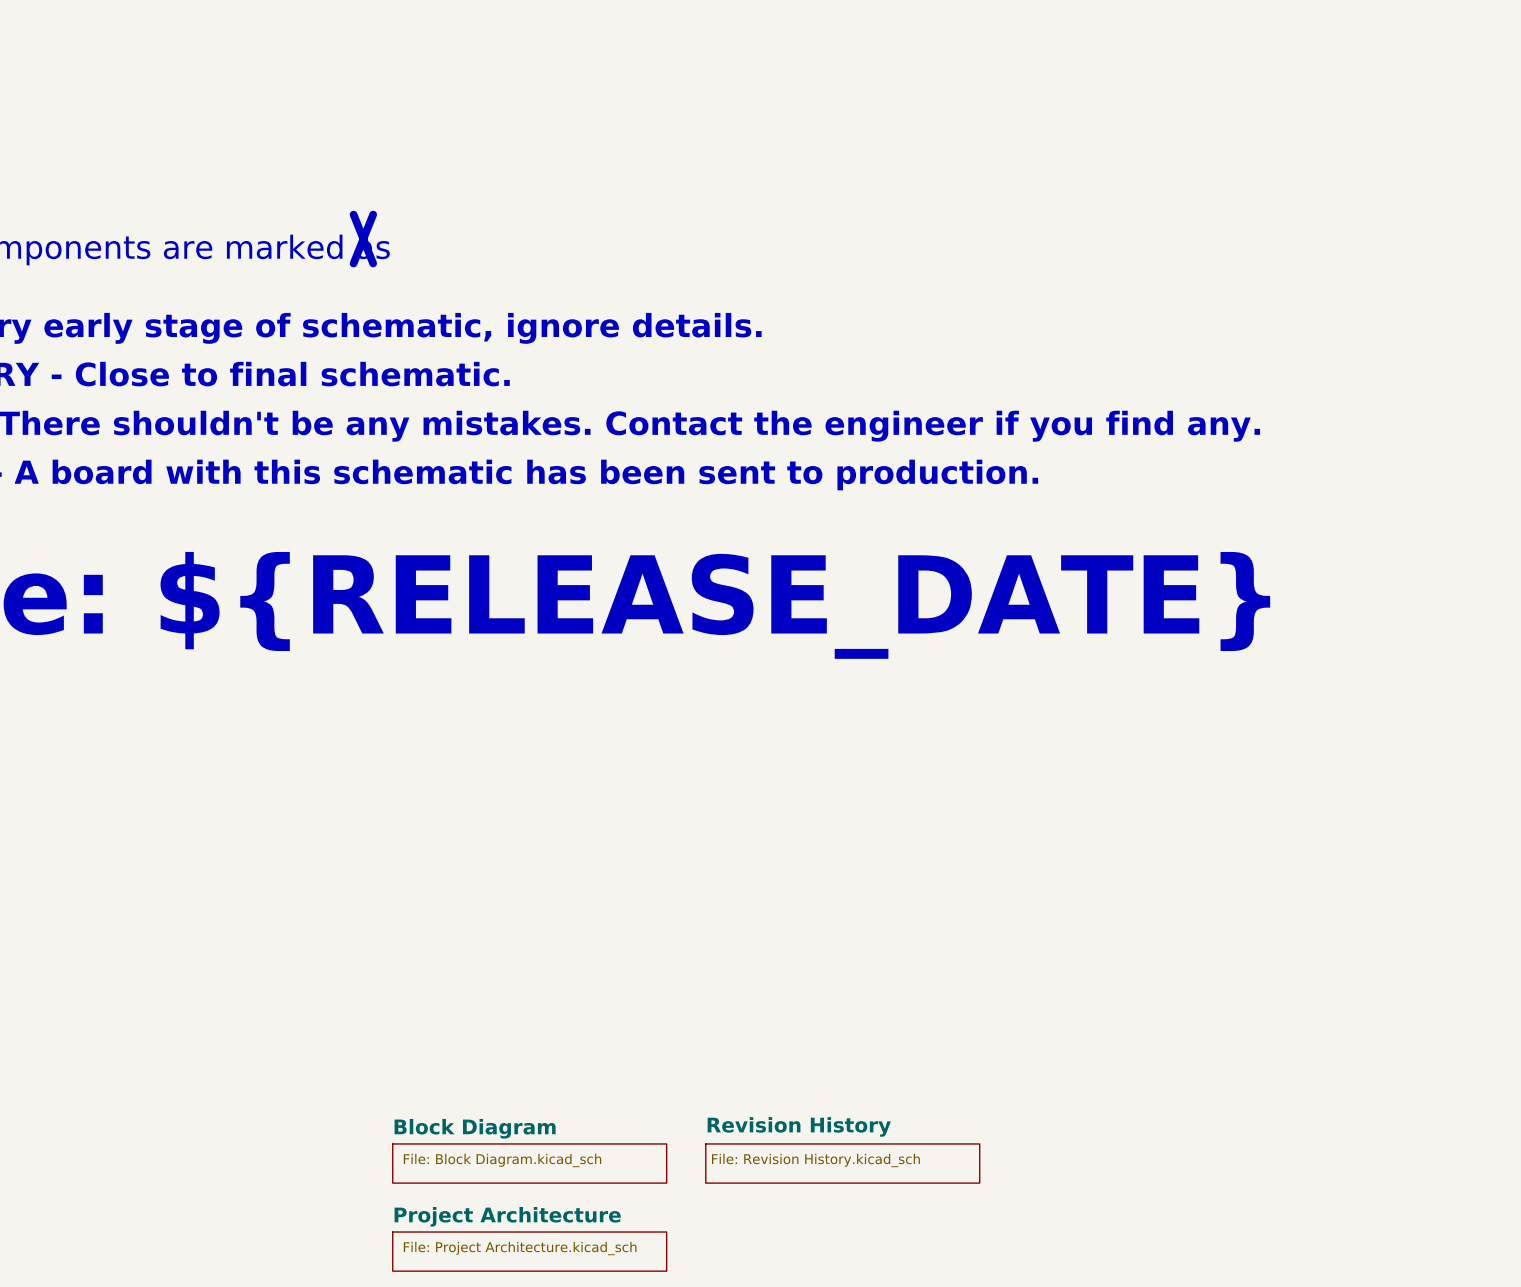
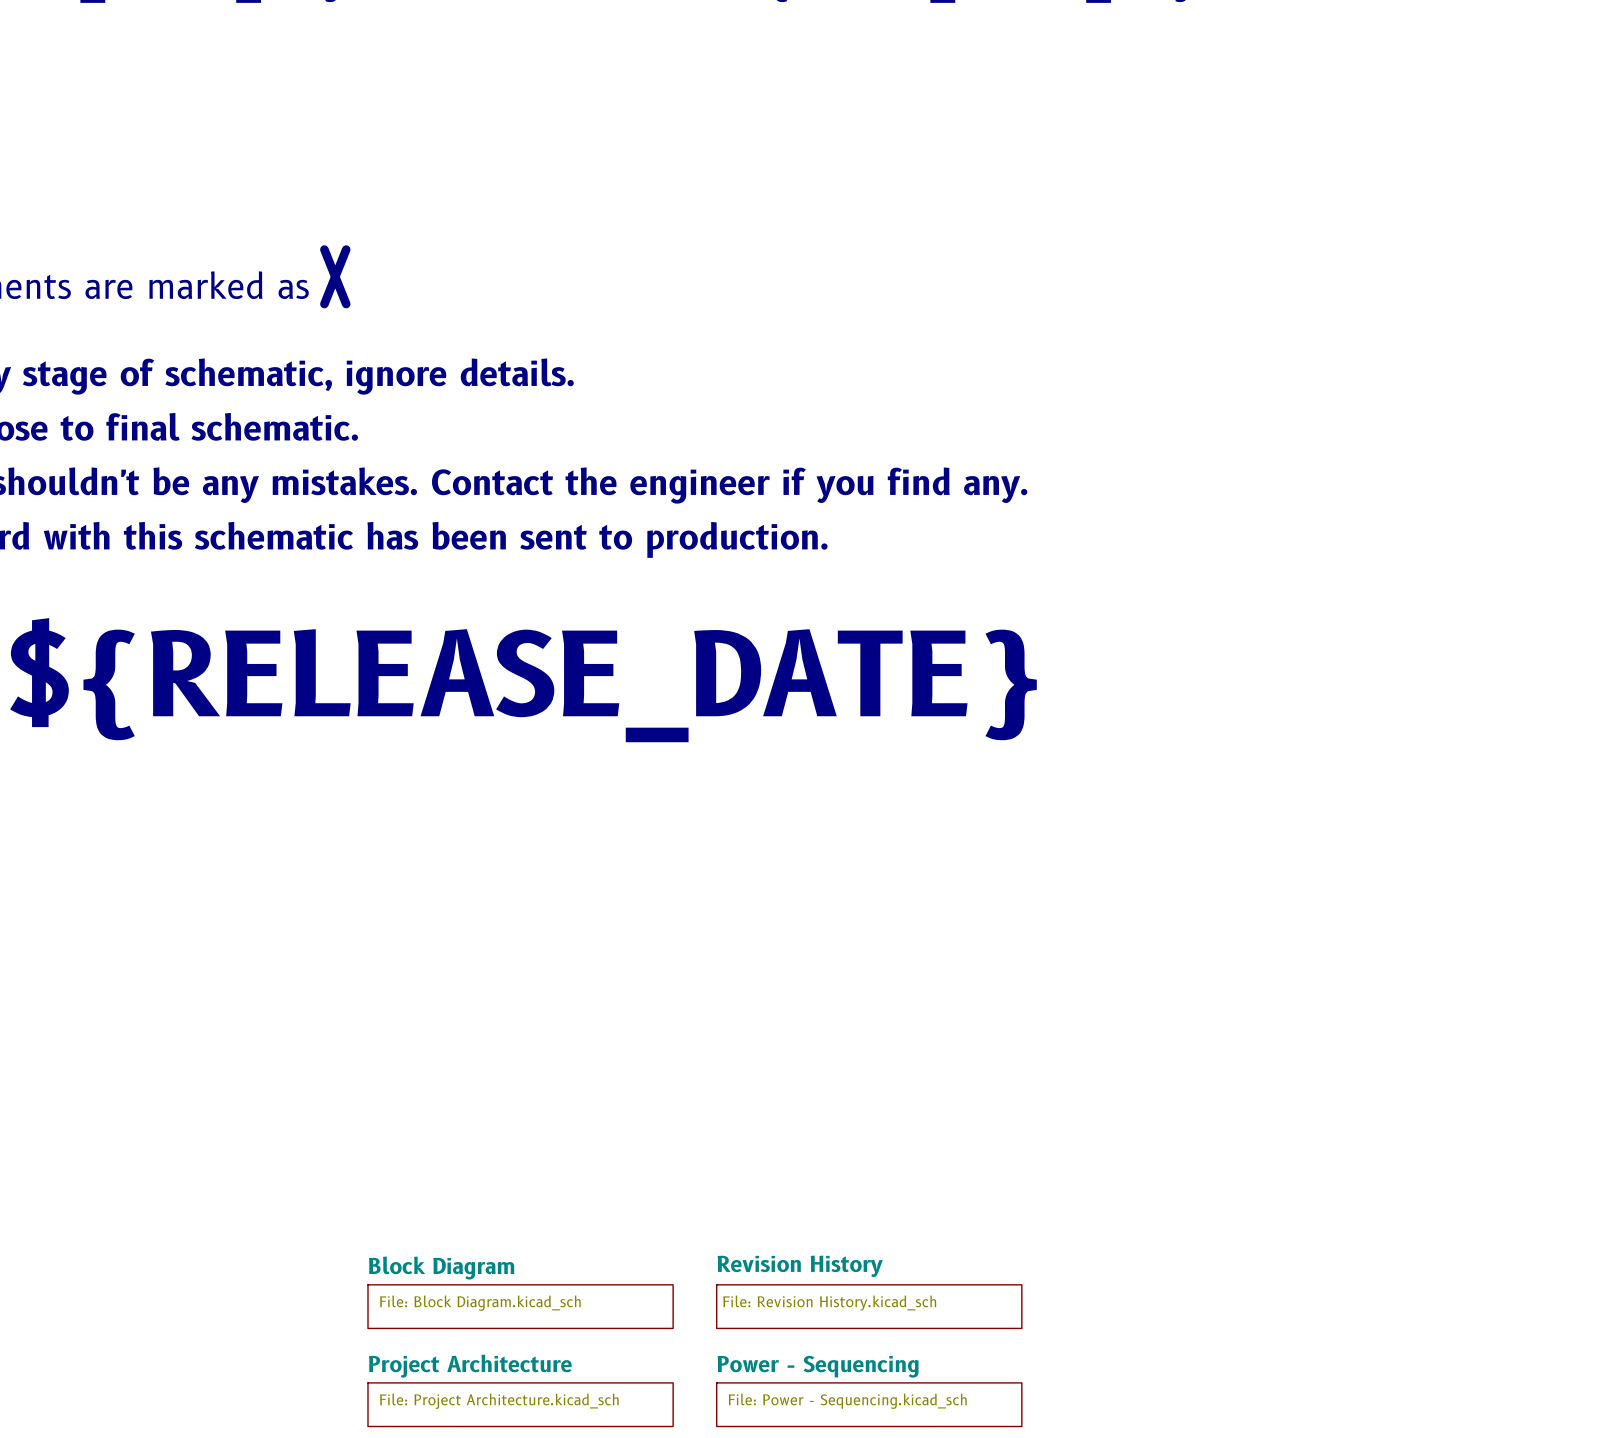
sheet Power - Sequencing: none -> File: Power - Sequencing.kicad_sch (869, 1404)

